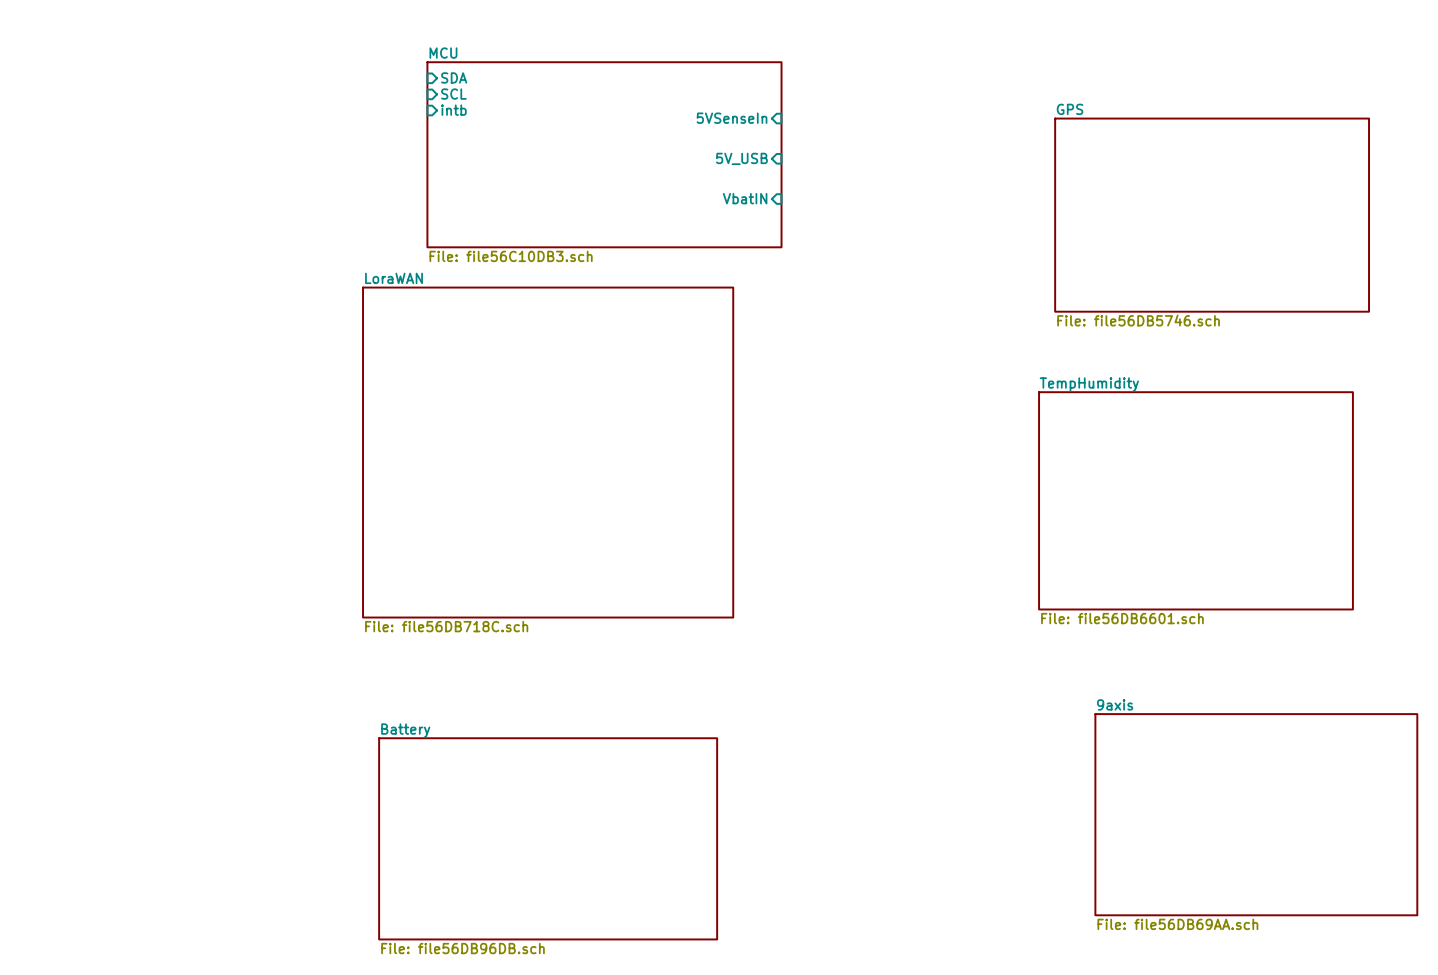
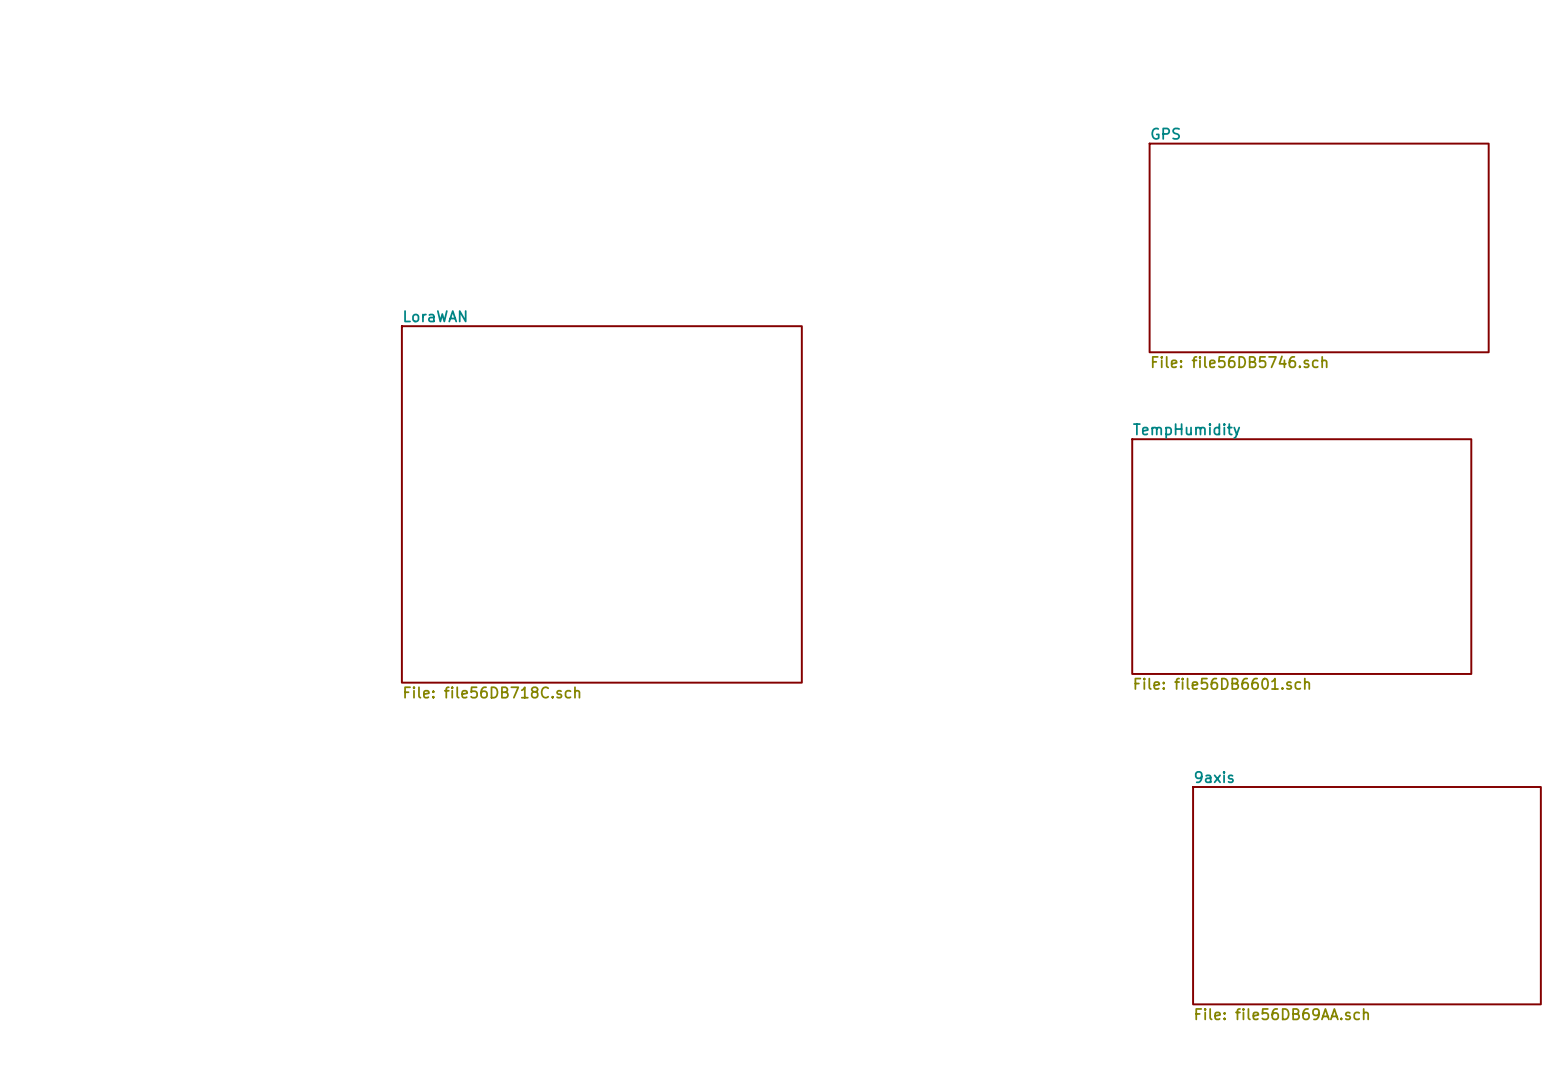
sheet pin: SDA (454, 77) -> none
sheet pin: SCL (453, 94) -> none
sheet pin: intb (453, 110) -> none
sheet pin: 5VSenseIn (732, 118) -> none
sheet MCU: File: file56C10DB3.sch (604, 154) -> none
sheet pin: 5V_USB (741, 158) -> none
sheet pin: VbatIN (745, 198) -> none
sheet Battery: File: file56DB96DB.sch (548, 838) -> none

